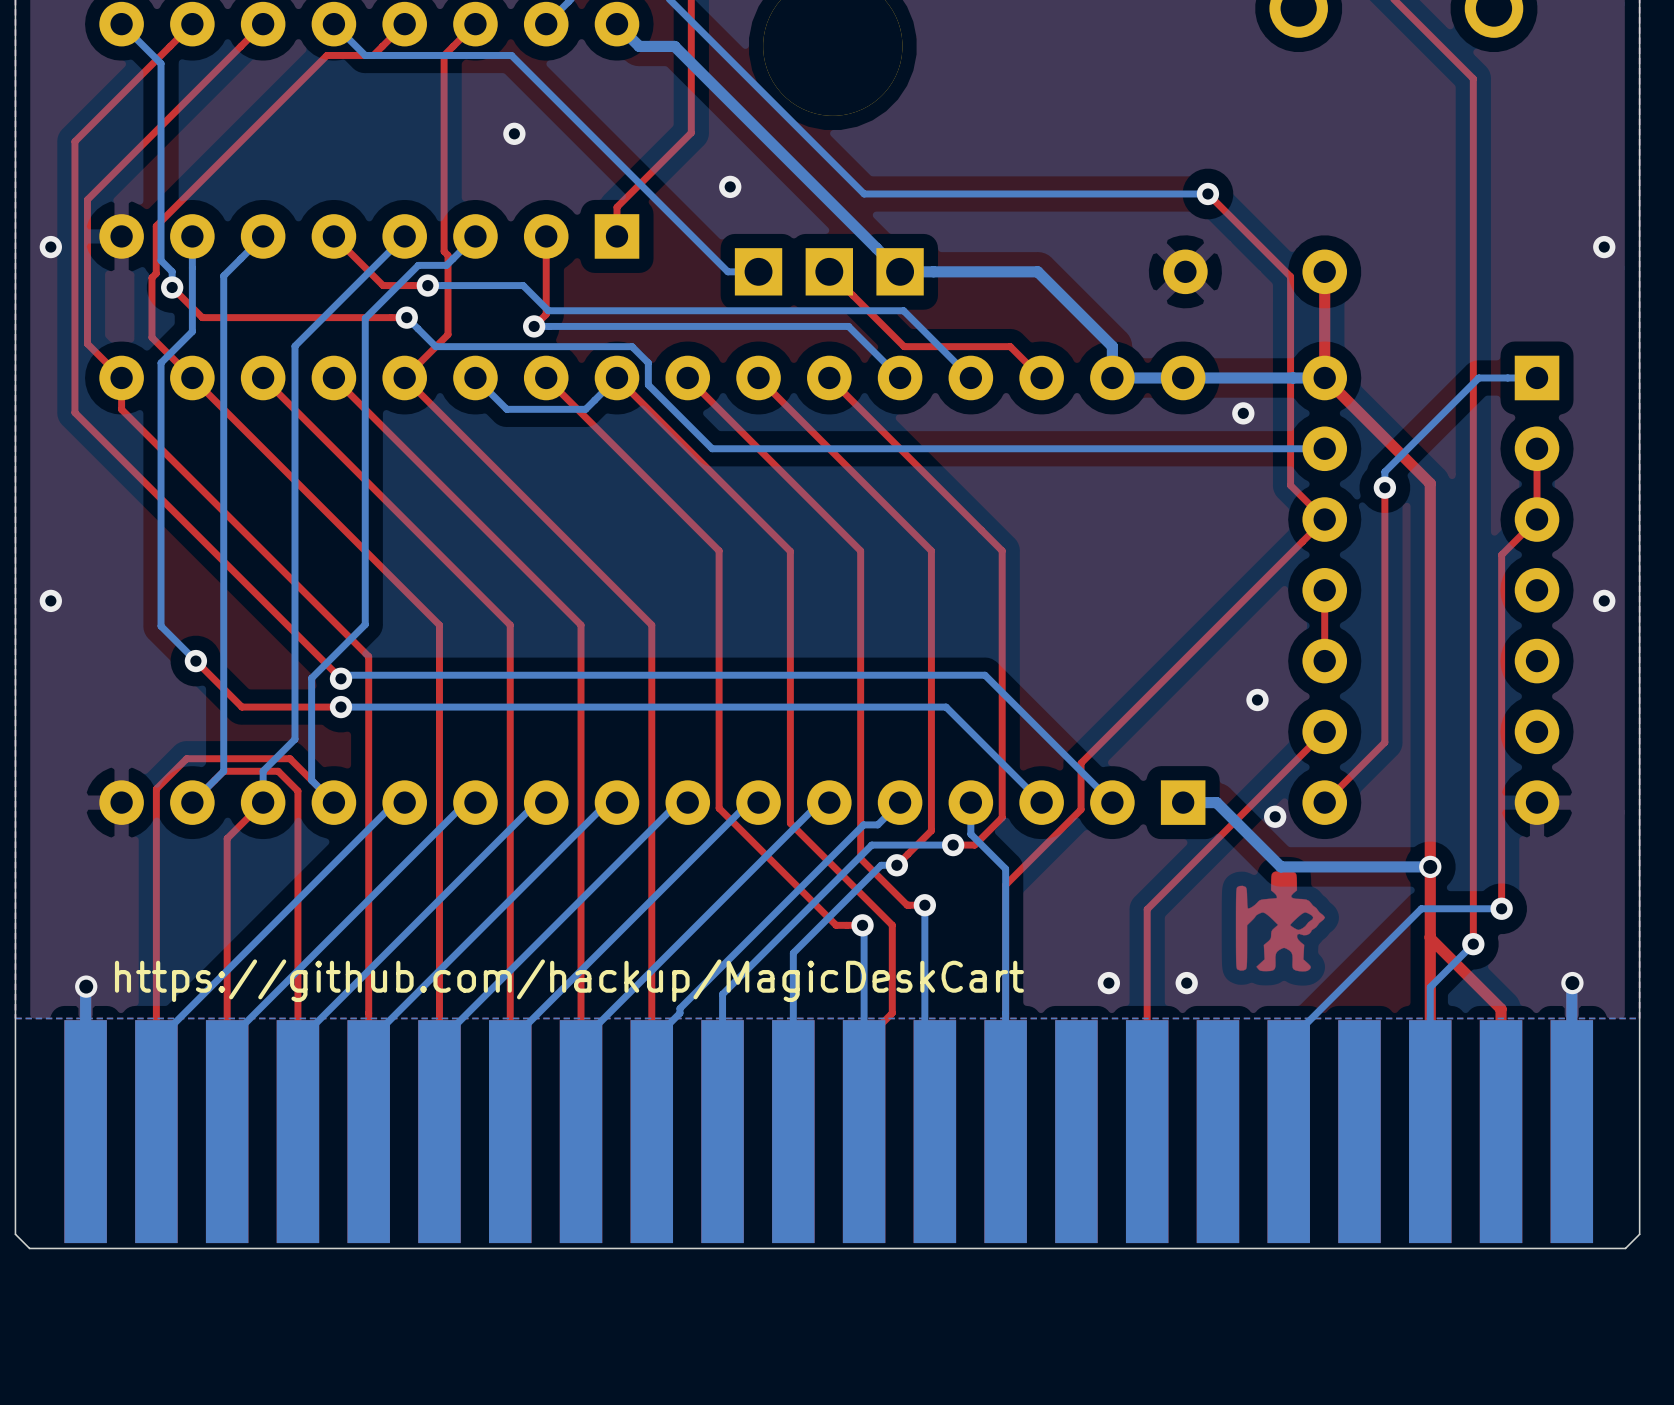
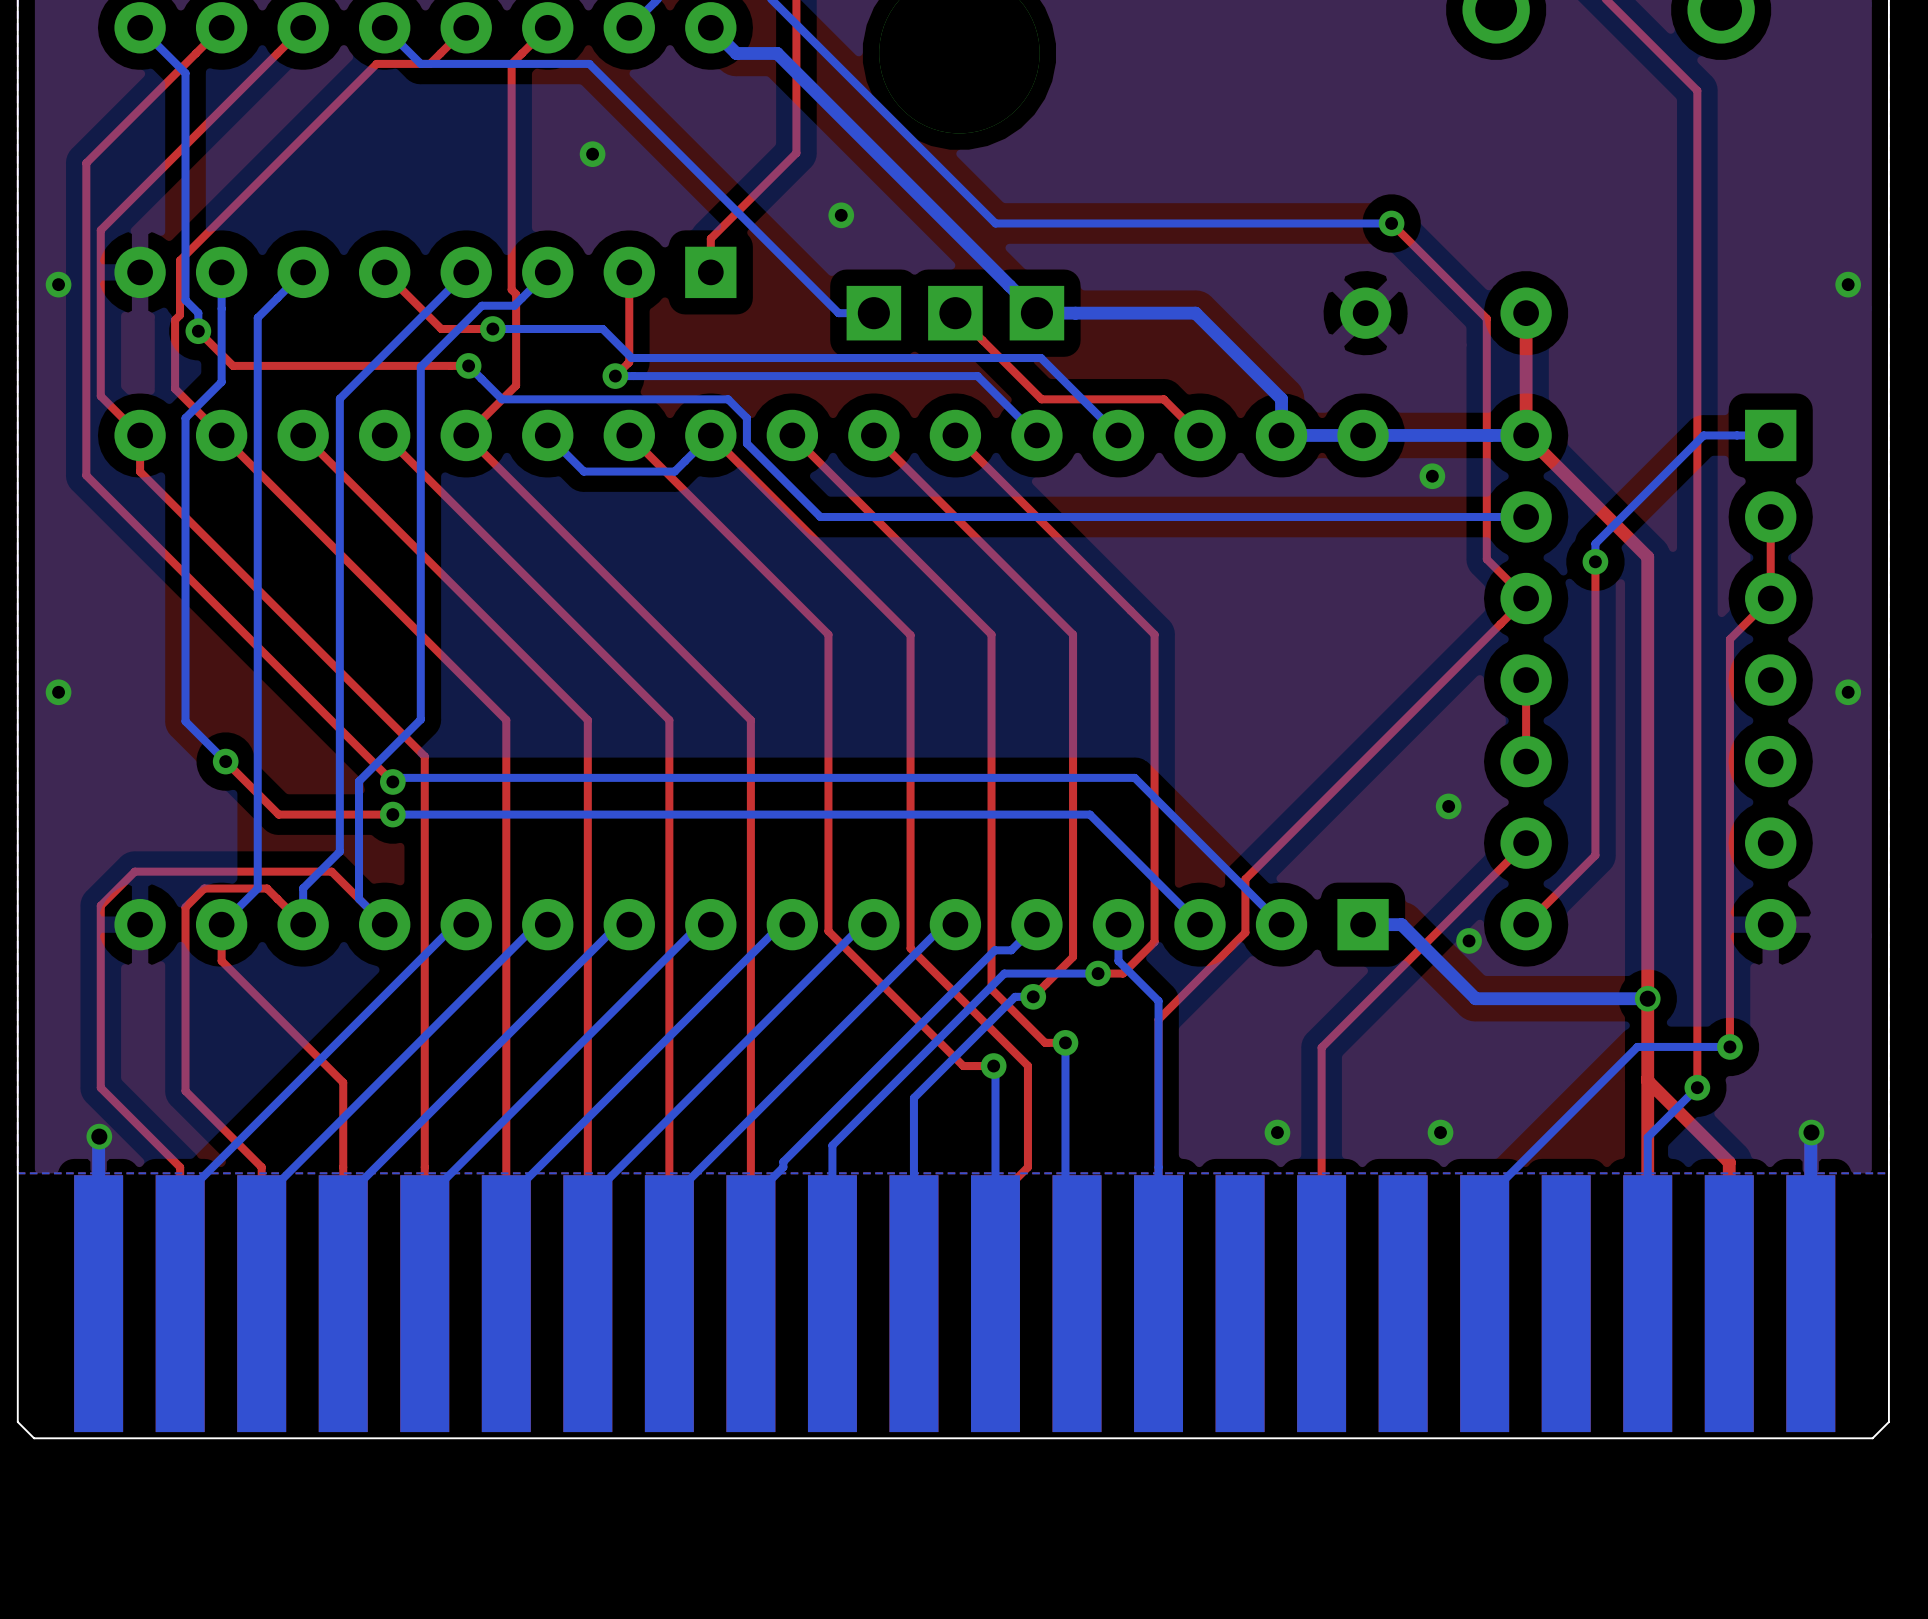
top track: (290, 758) (186, 758) (156, 789) (156, 1013) -> (334, 874) (331, 871) (134, 871) (100, 905) (100, 1087) (180, 1167)
top track: (231, 771) (278, 771) (297, 791) (297, 939) -> (221, 924) (221, 960) (343, 1082)
top track: none -> (267, 888) (303, 924)
top track: (263, 802) (227, 838) (227, 1013) -> (257, 888) (204, 888) (185, 907) (185, 1091) (261, 1167)
drawing: [1235, 871, 1325, 972] -> none
text: https://github.com/hackup/MagicDeskCart (569, 980) -> none
via position: (1186, 983) -> (1440, 1132)

